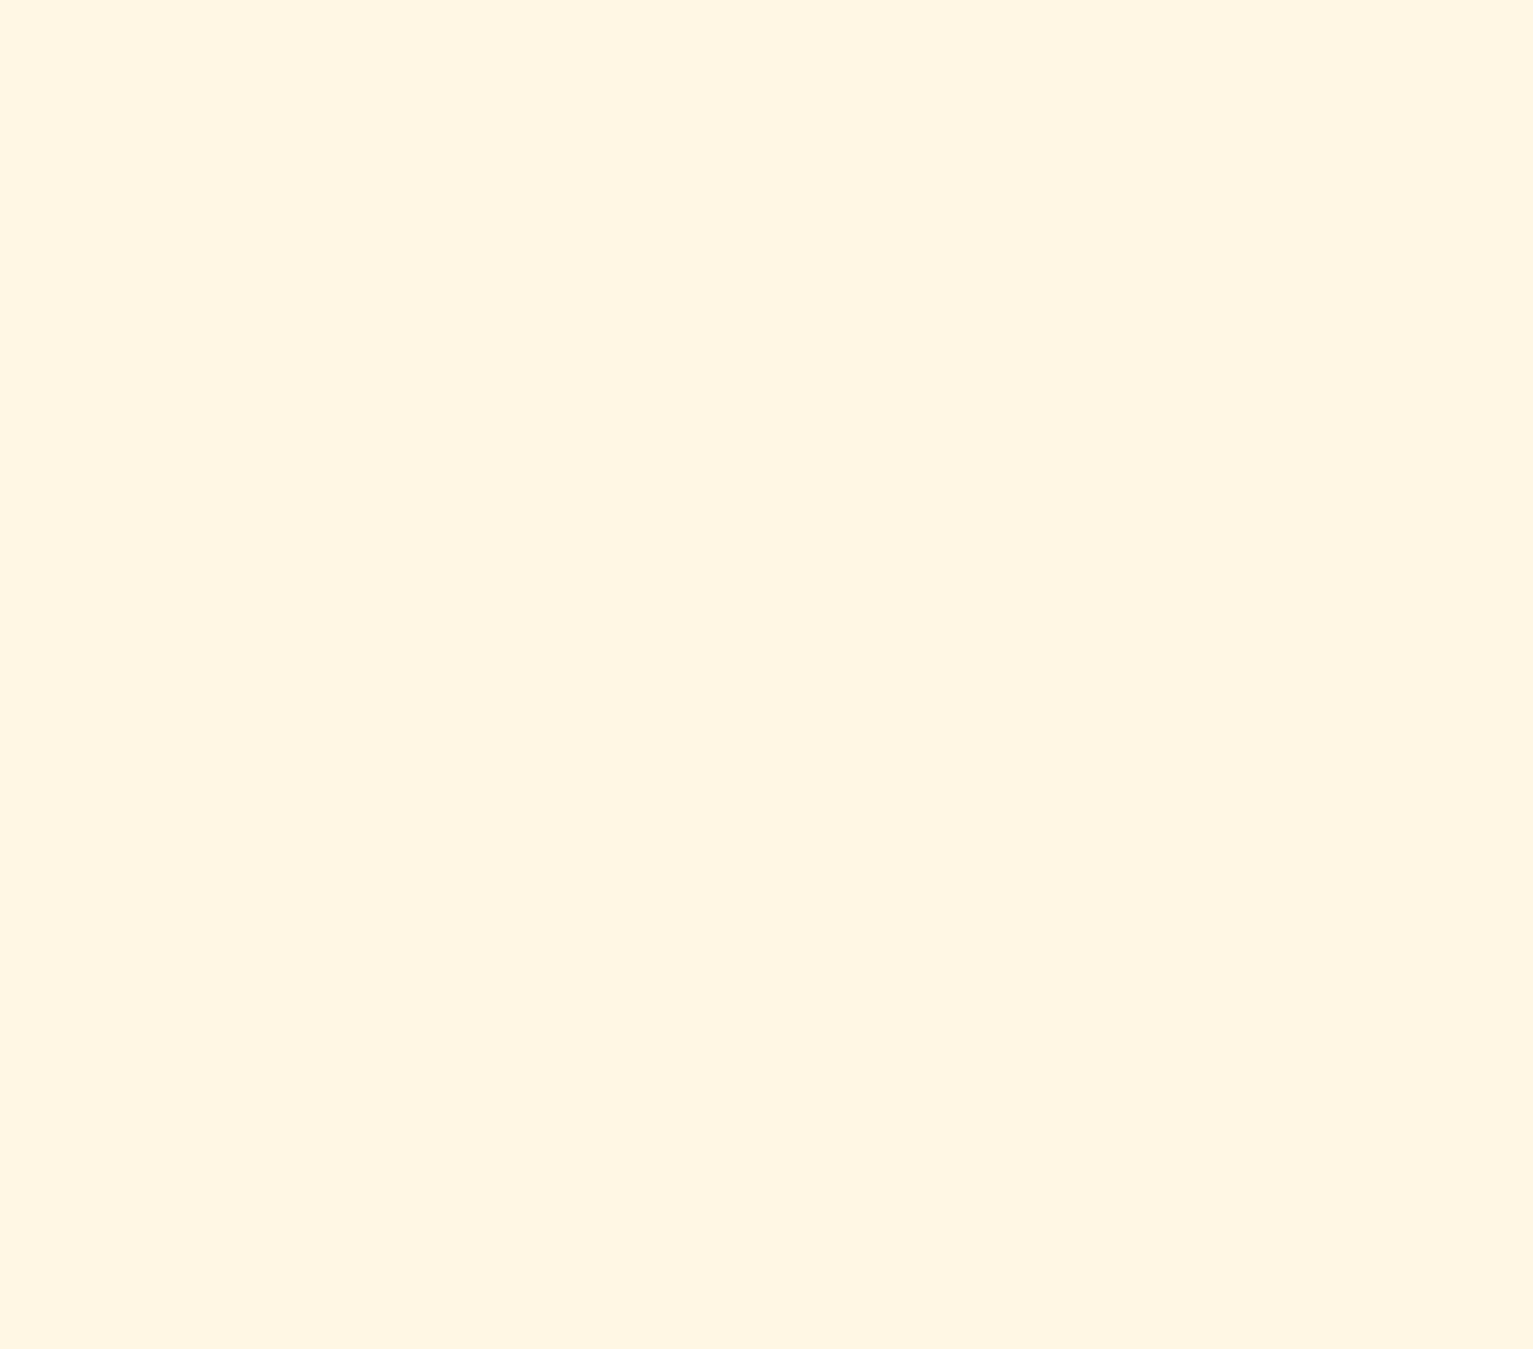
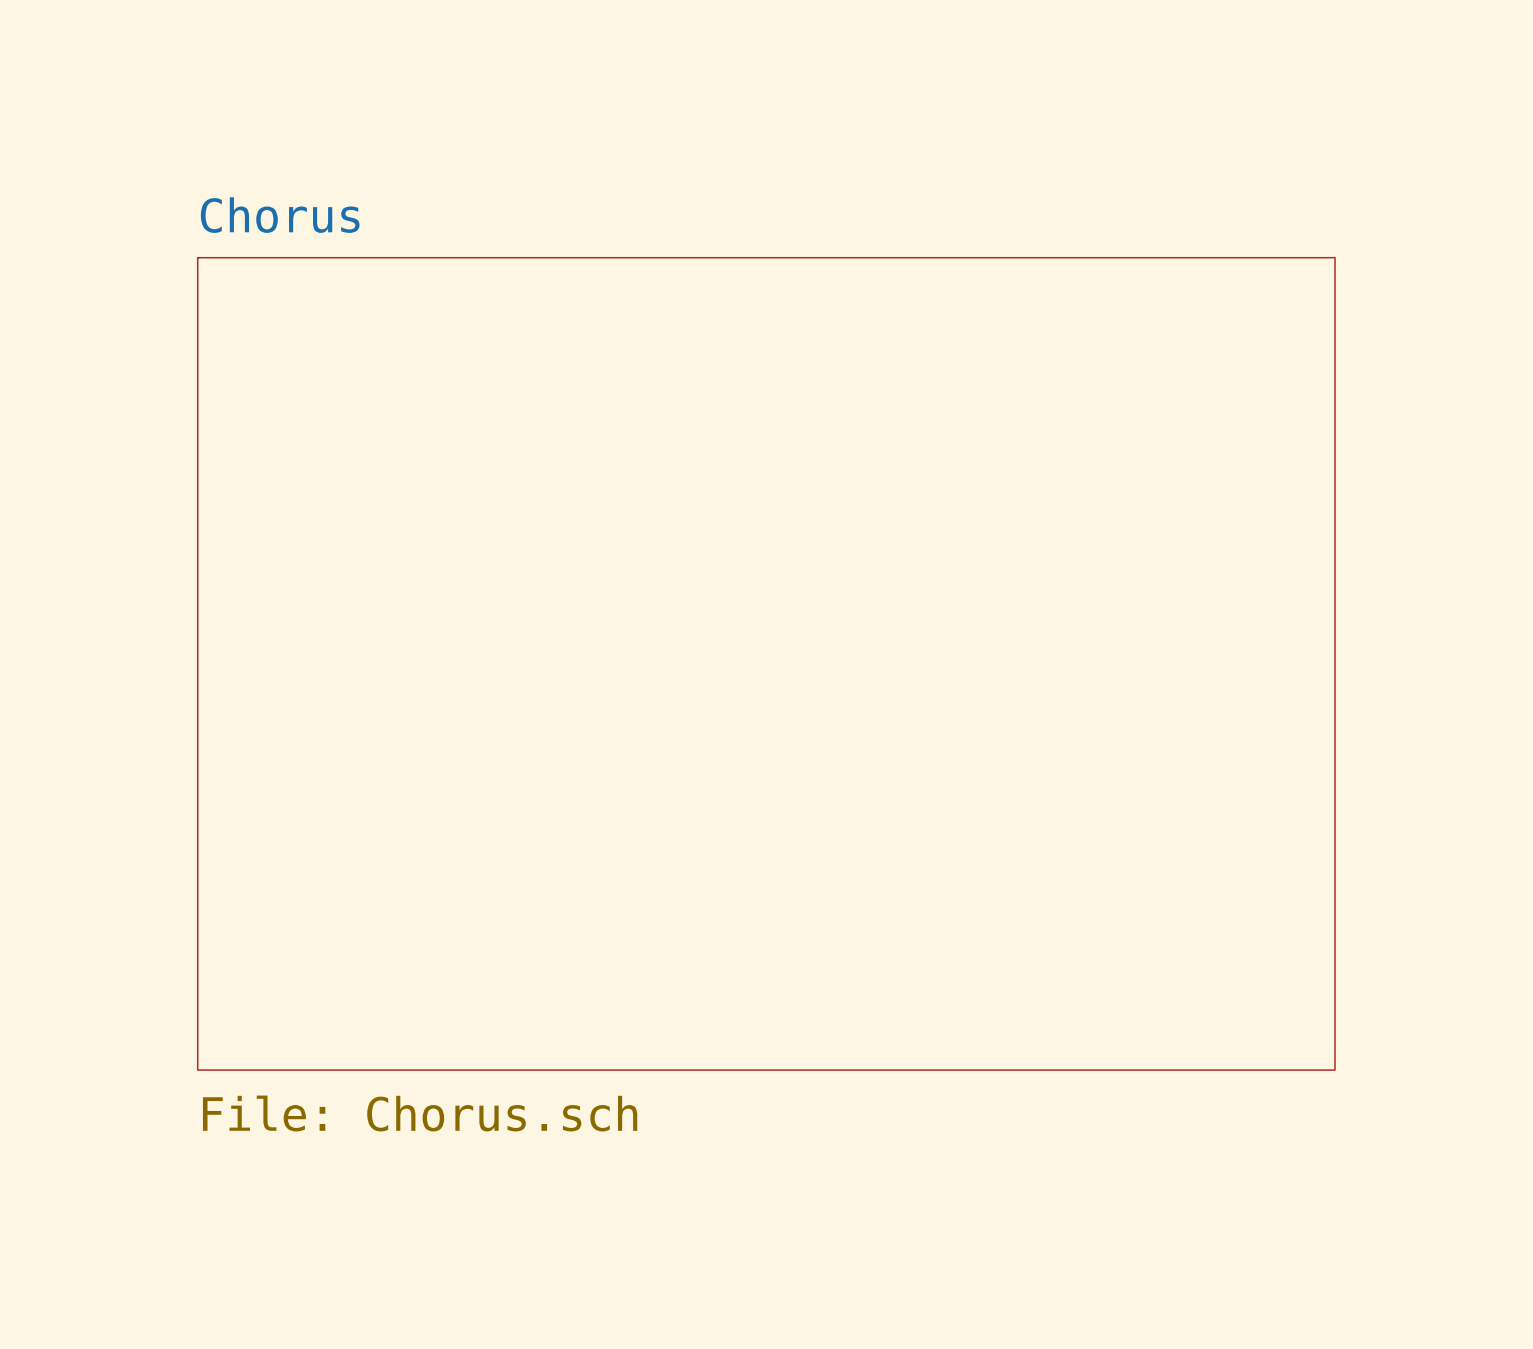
sheet Chorus: none -> File: Chorus.sch (766, 663)

